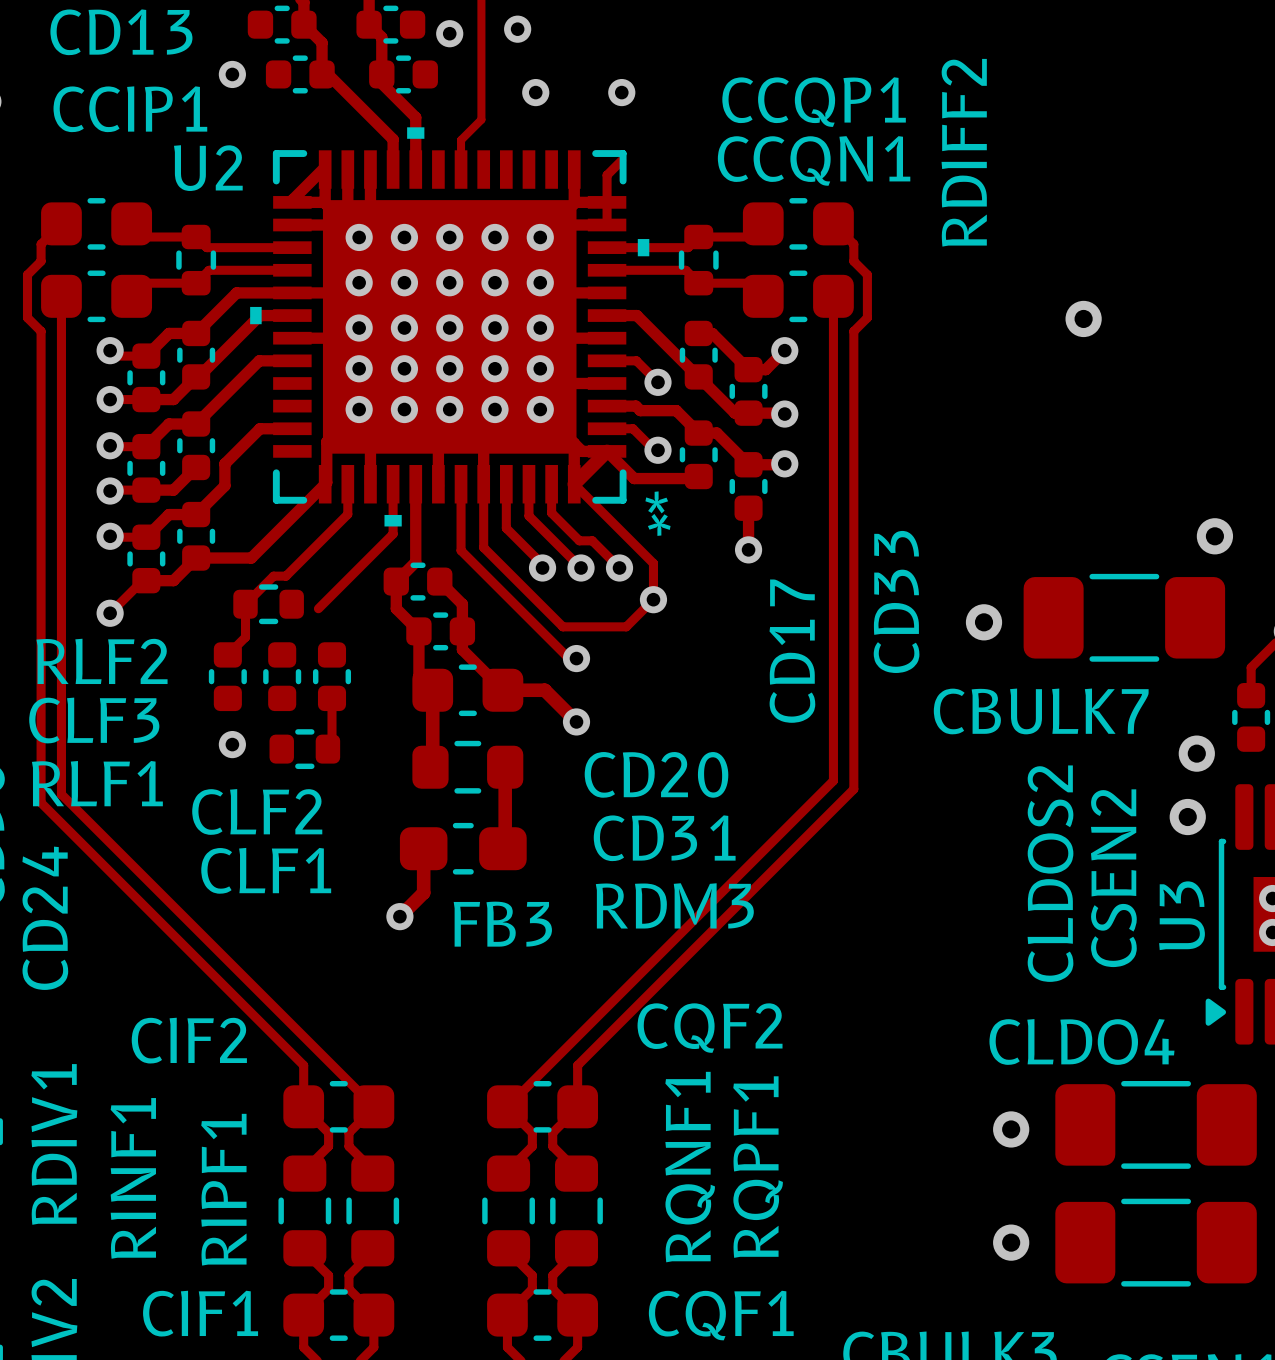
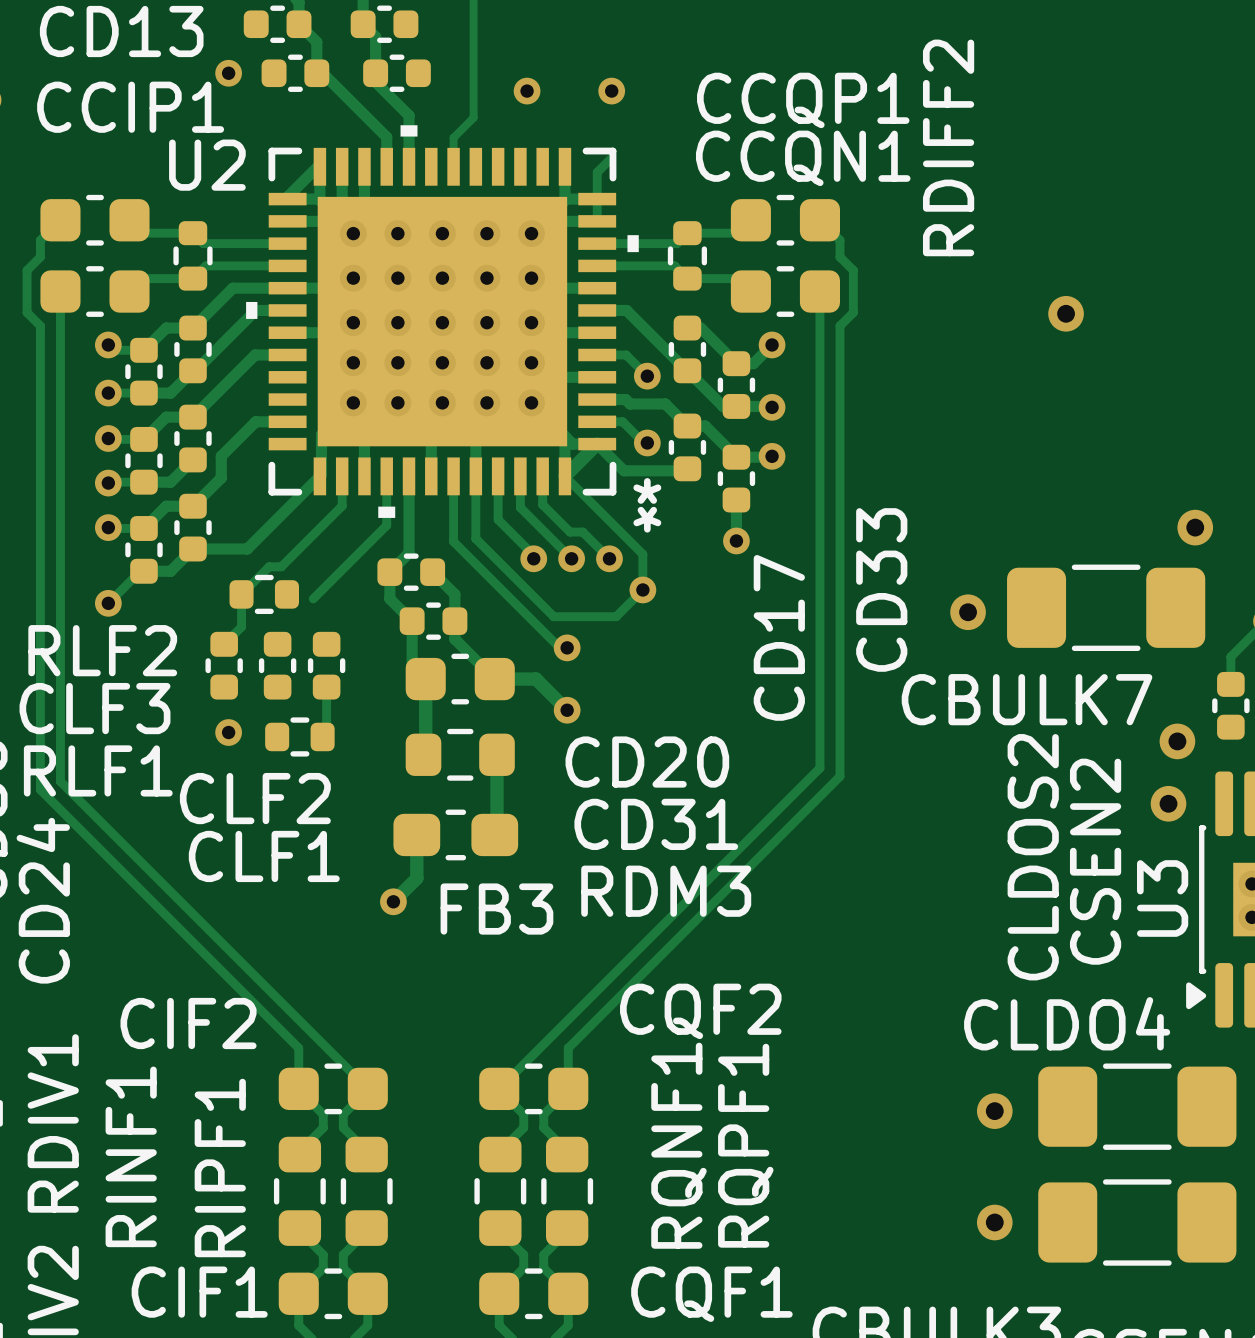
via: (517, 29) -> none
via: (449, 33) -> none

